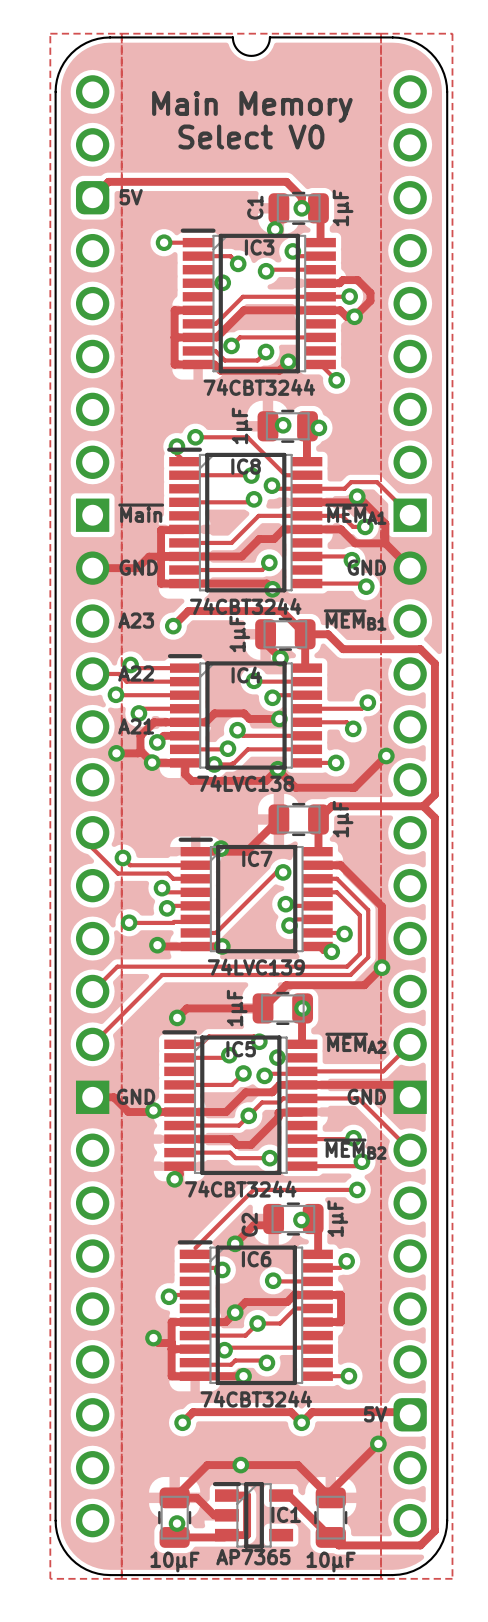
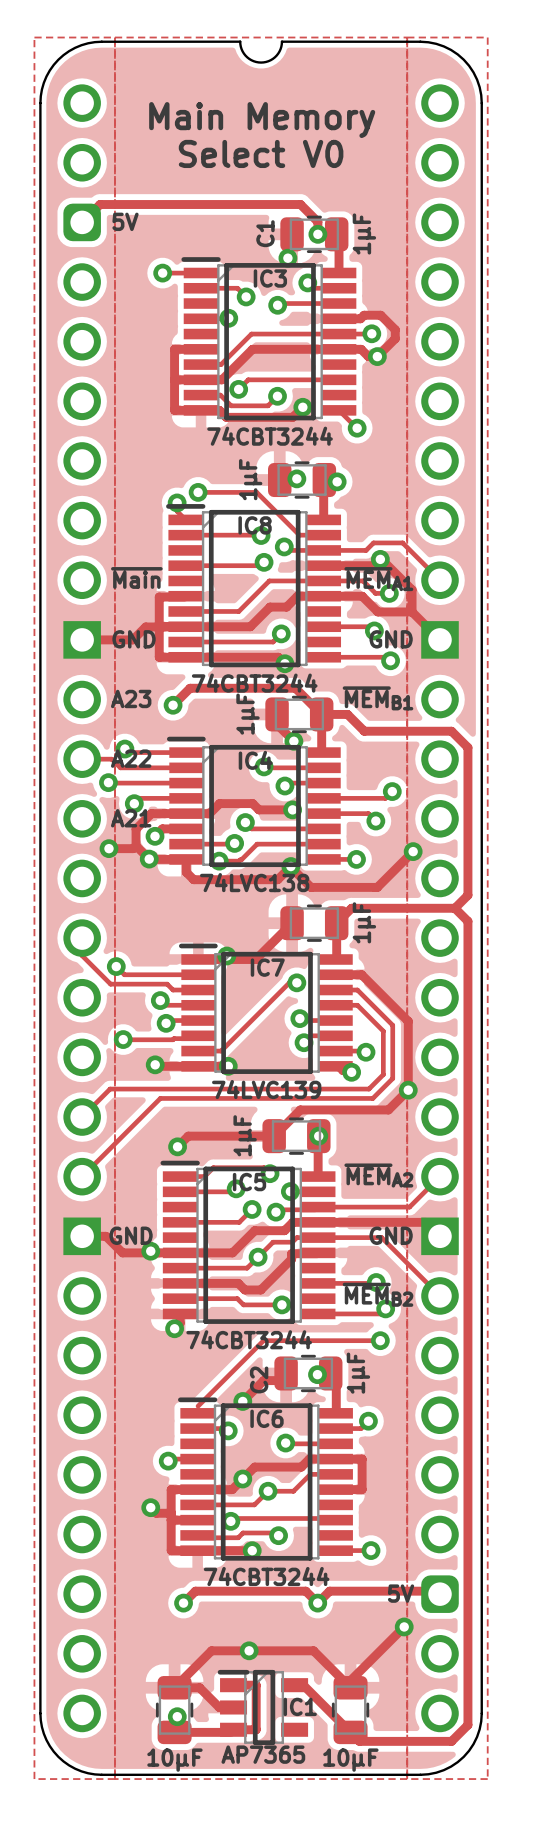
part footprint: [54, 36, 449, 1577] -> [39, 40, 483, 1776]

